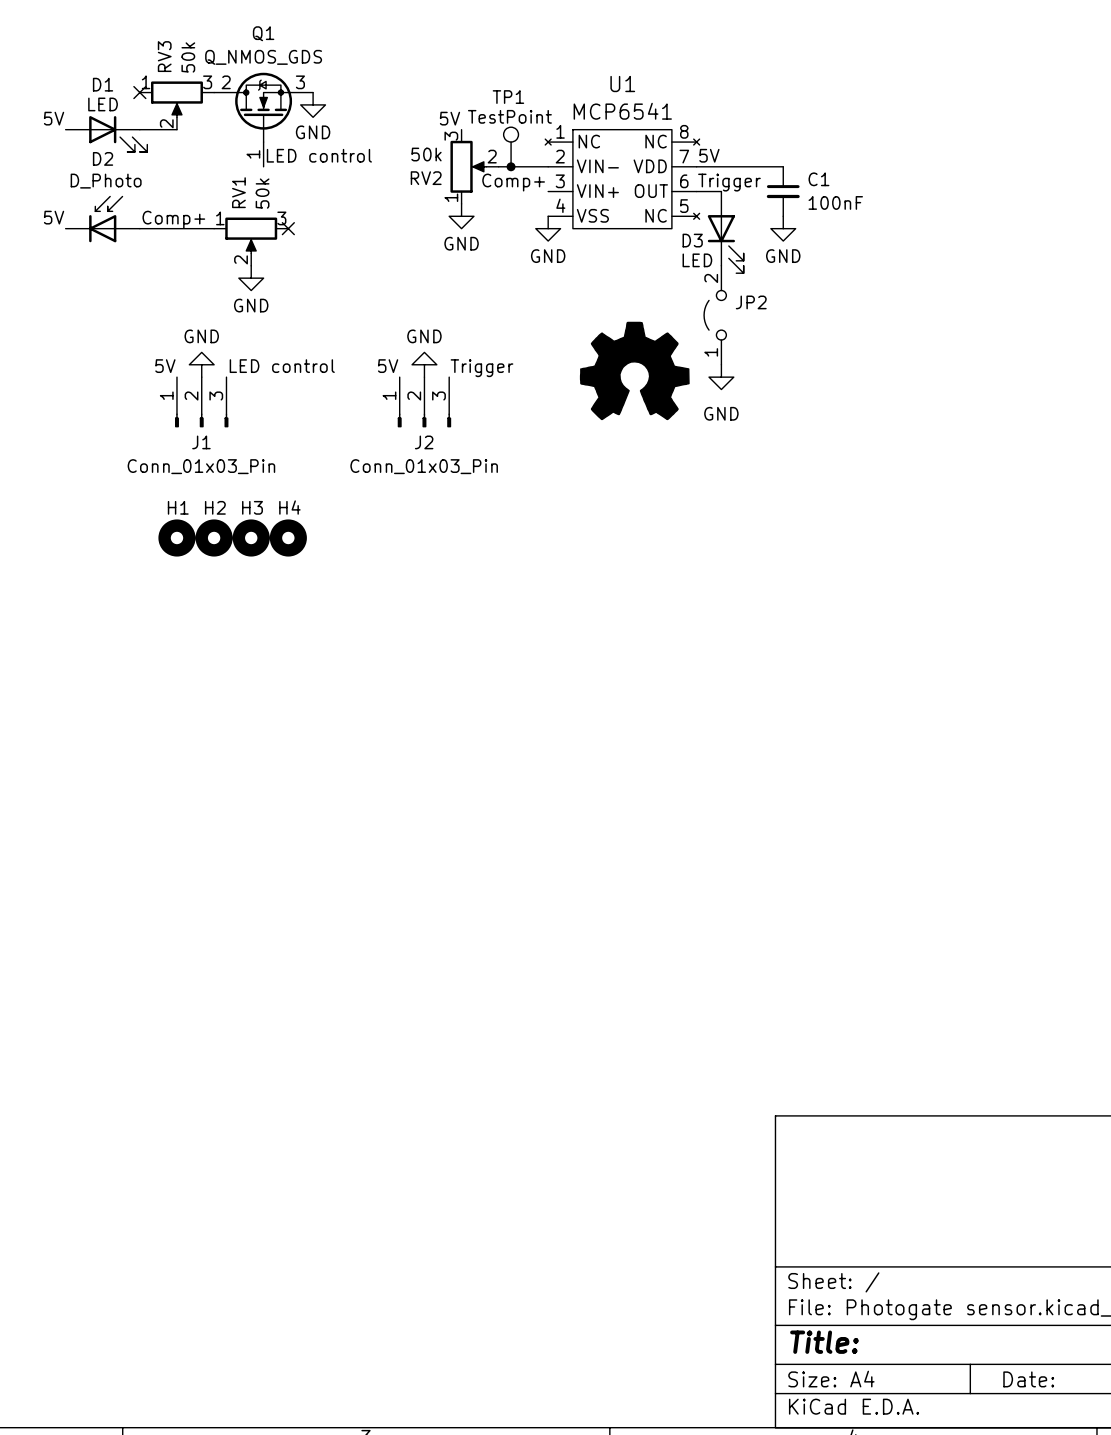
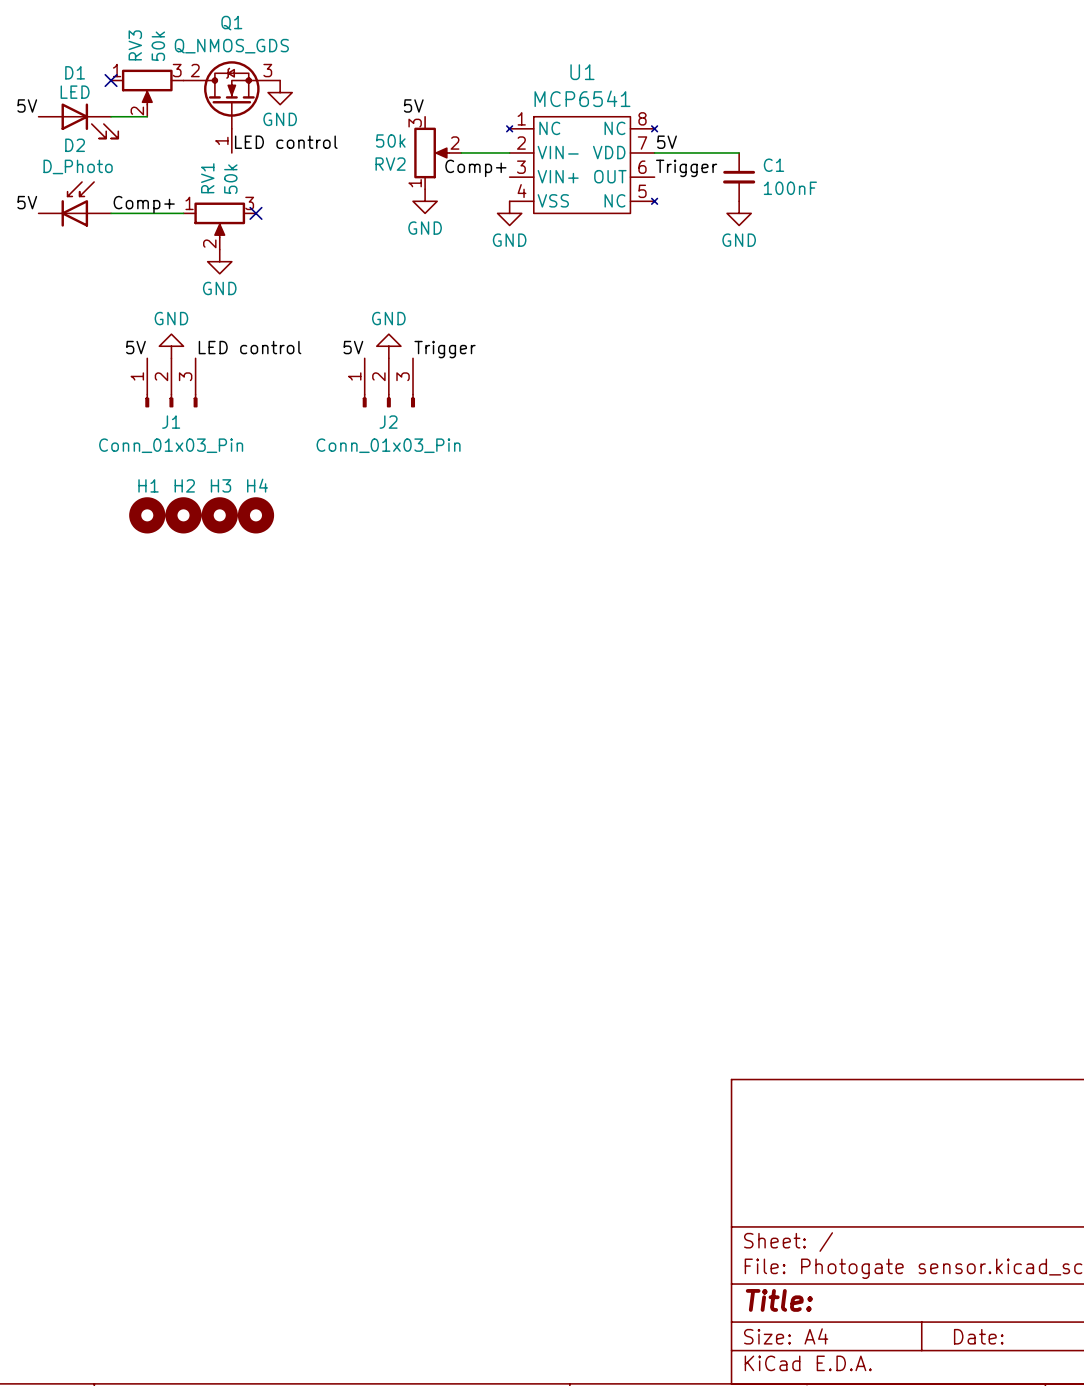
TP1: TestPoint (511, 147) -> none
junction: (511, 166) -> none
wire: (696, 191) (721, 191) -> none
D3: LED (725, 232) -> none
JP2: (715, 315) -> none
part: (634, 370) -> none
power symbol: GND (721, 377) -> none

